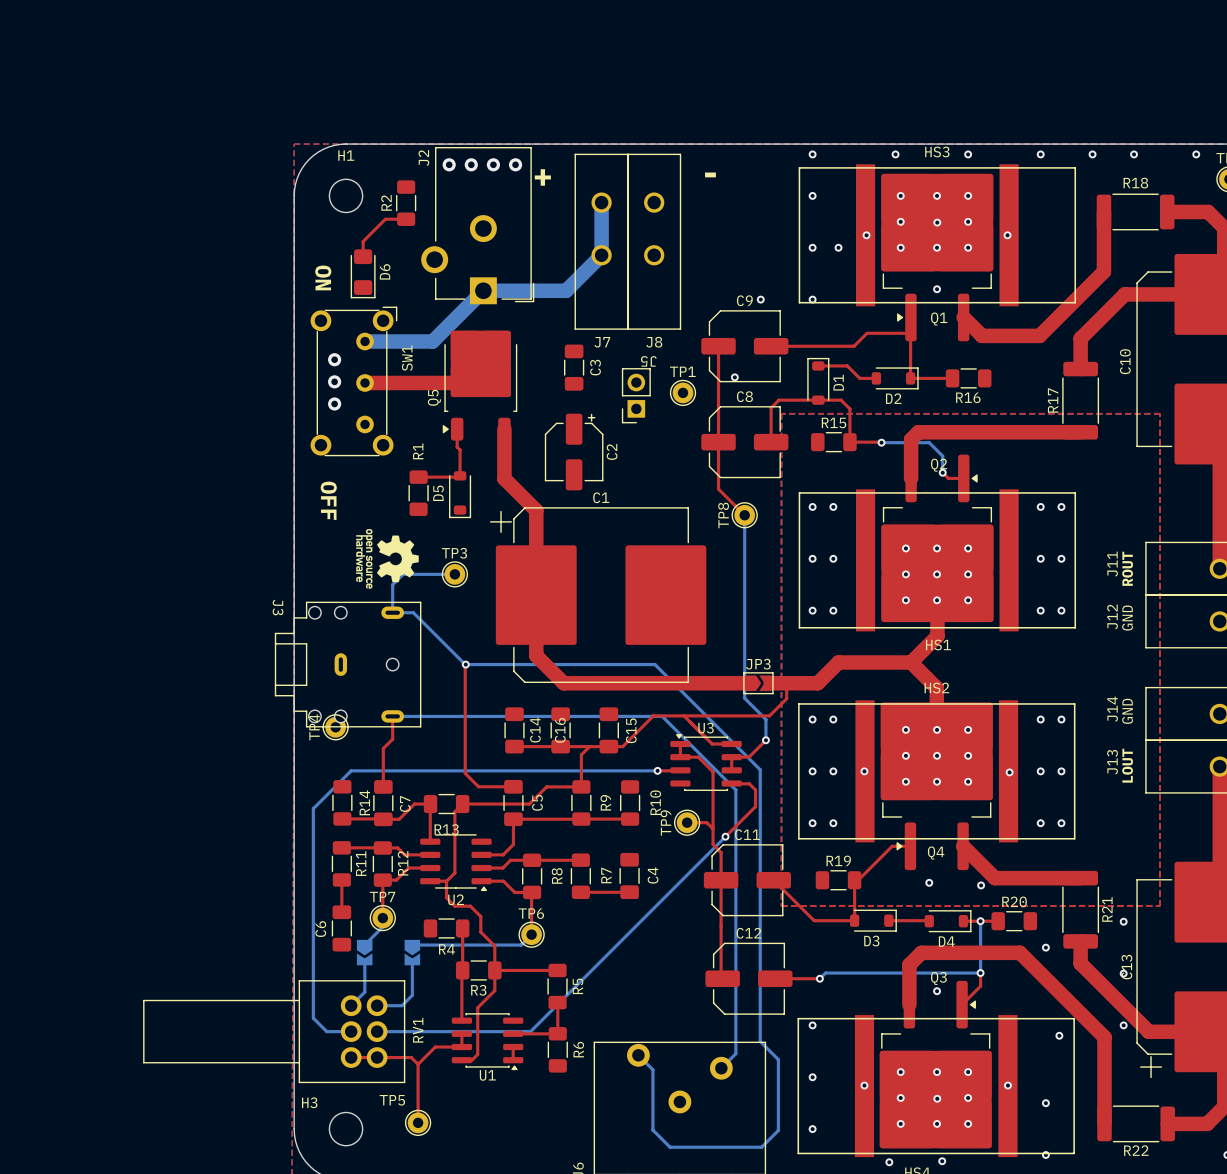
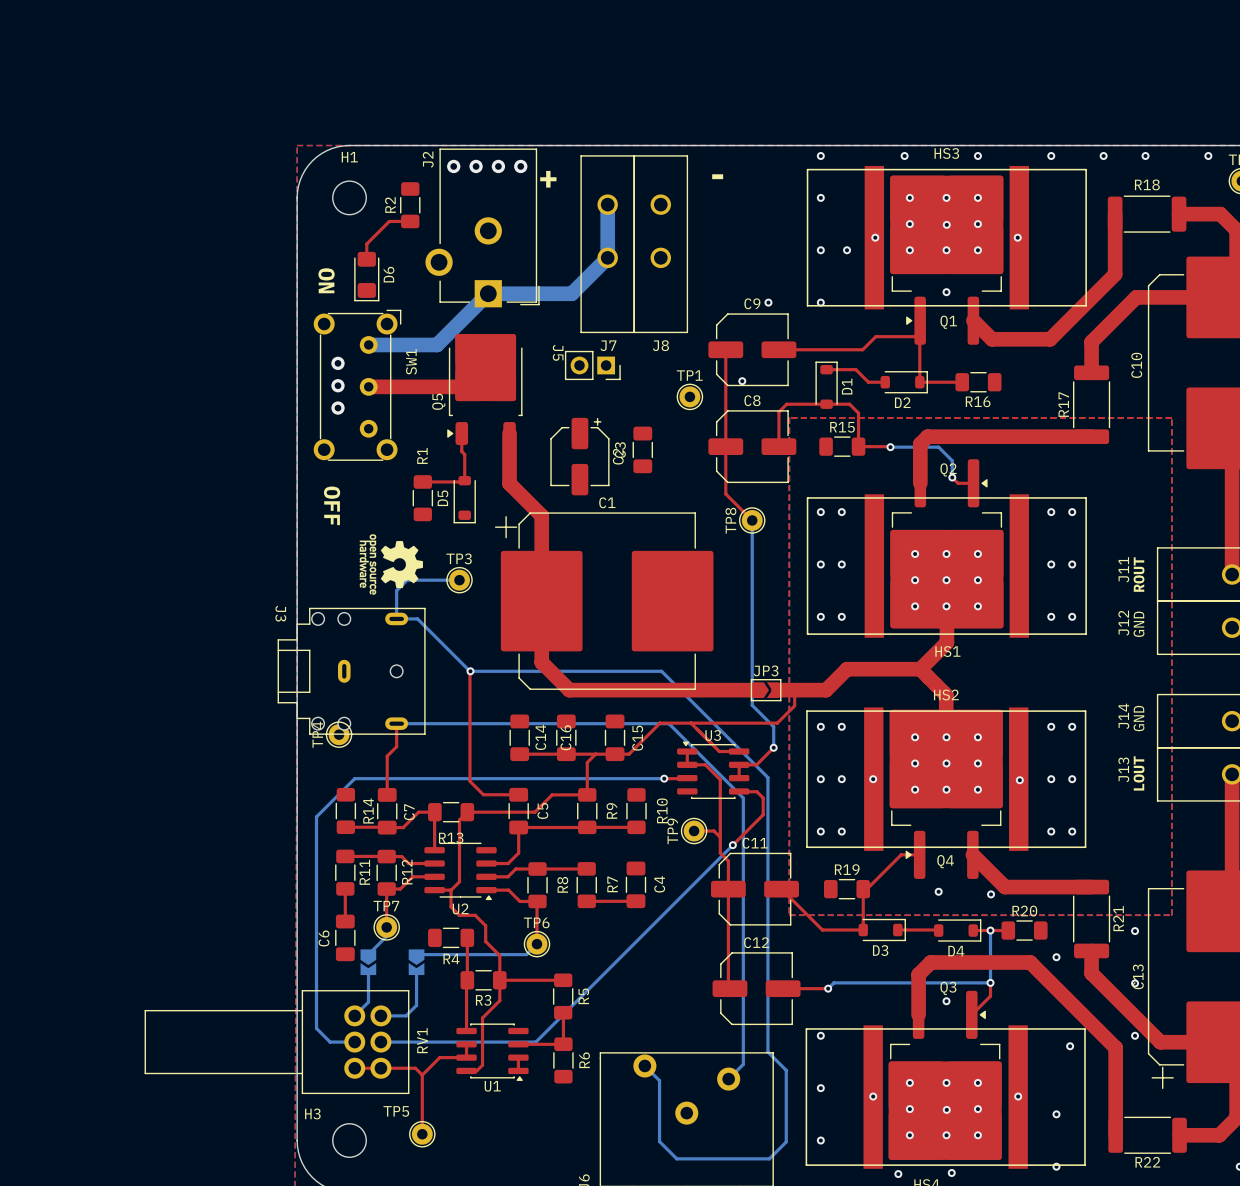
C3 position: (574, 367) -> (642, 449)
C3 name position: C3 (595, 367) -> C3 (620, 450)
J5 rotation: 0° (636, 395) -> 90° counterclockwise (592, 365)
J5 position: (636, 395) -> (592, 365)

